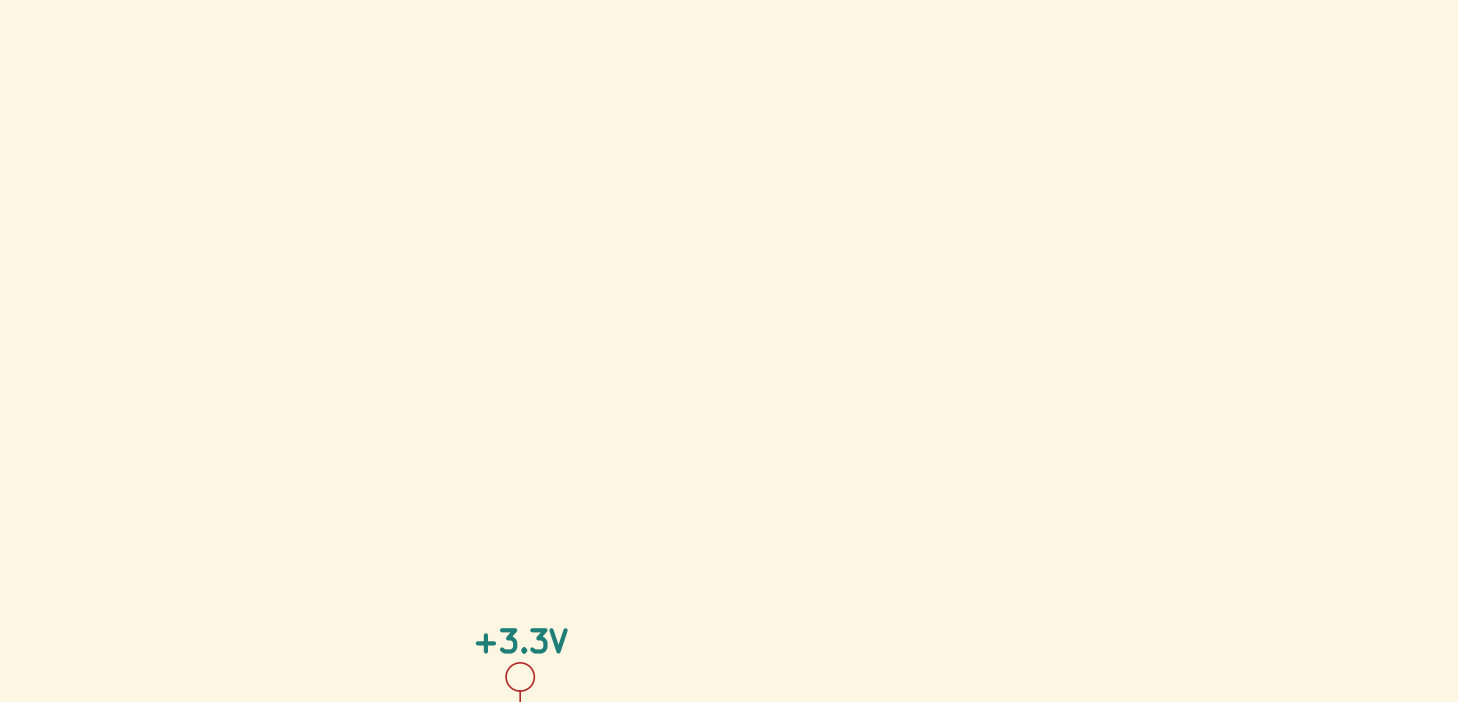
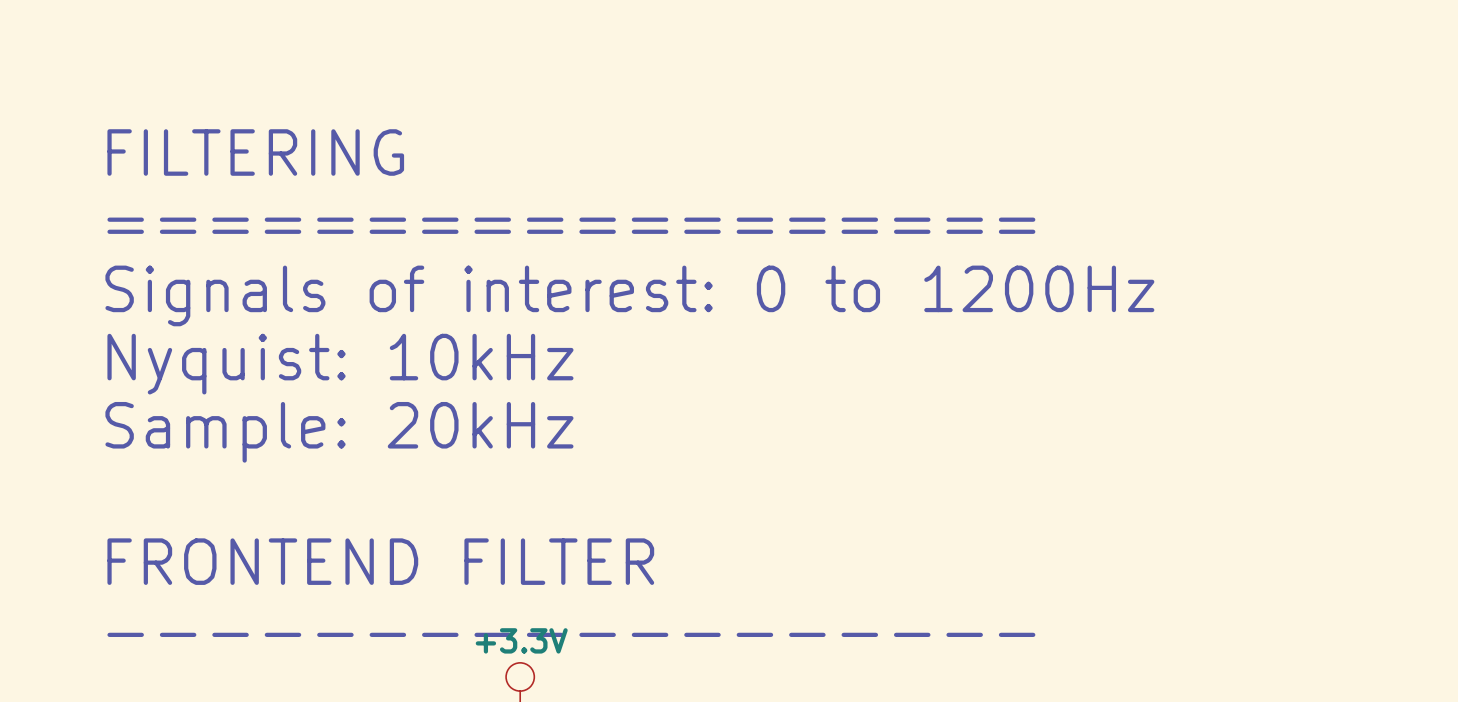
text: none -> FILTERING (255, 152)
text: none -> ================== (571, 225)
text: none -> Signals of interest: 0 to 1200Hz (629, 295)
text: none -> Nyquist: 10kHz (340, 364)
text: none -> Sample: 20kHz (339, 432)
text: none -> FRONTEND FILTER (380, 561)
text: none -> ------------------ (571, 634)

